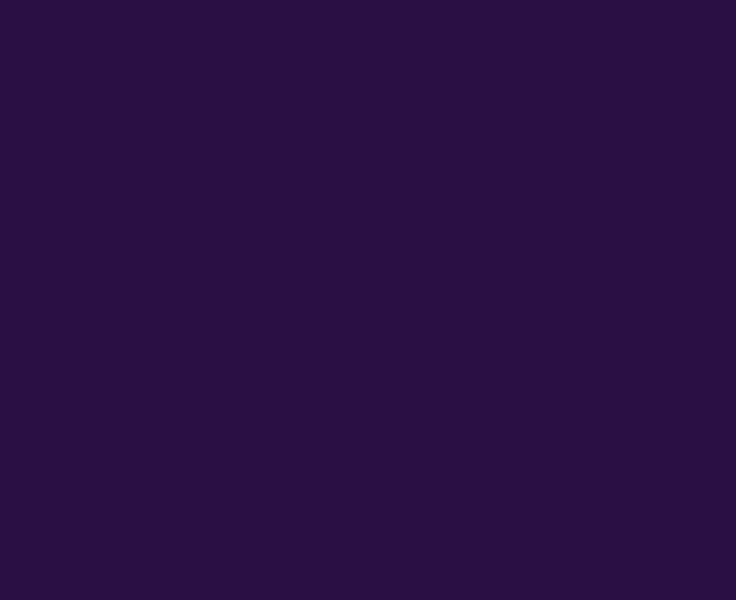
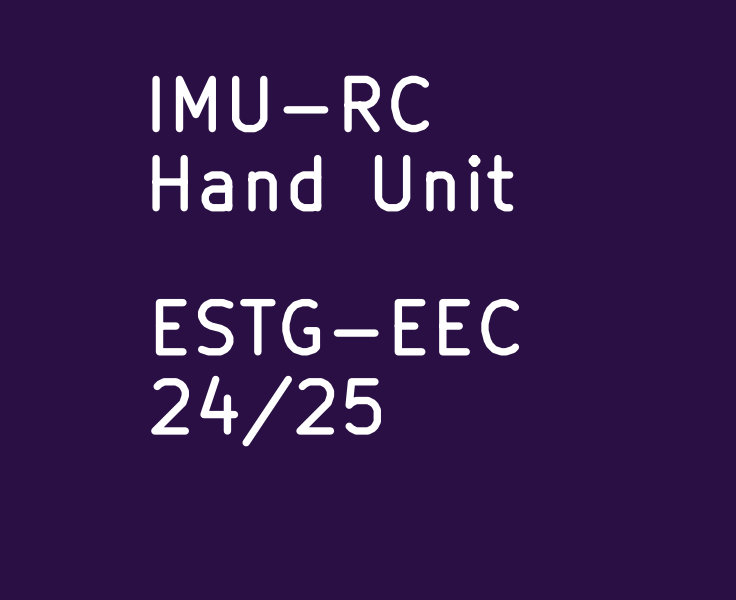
text: none -> IMU-RC (290, 103)
text: none -> Hand Unit (332, 183)
text: none -> ESTG-EEC (337, 327)
text: none -> 24/25 (266, 411)

